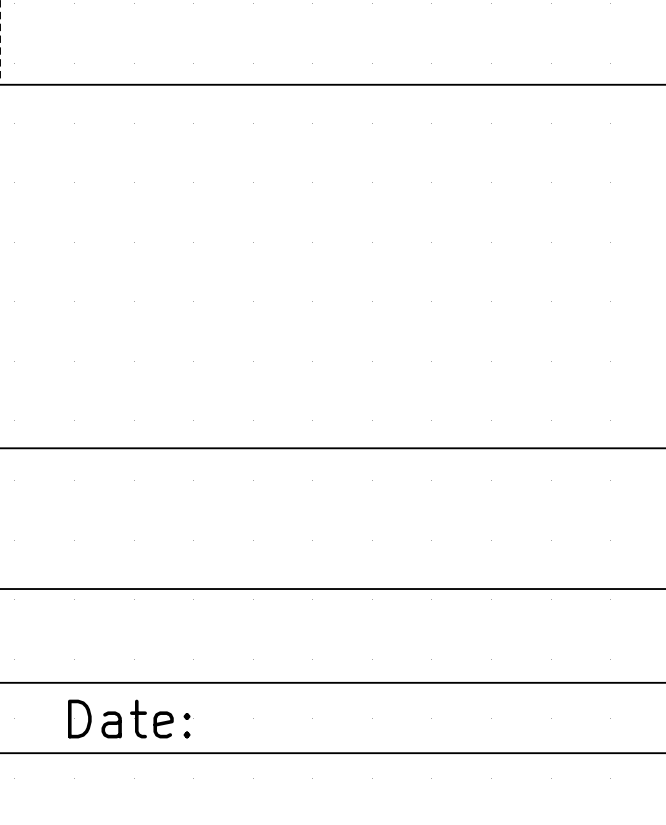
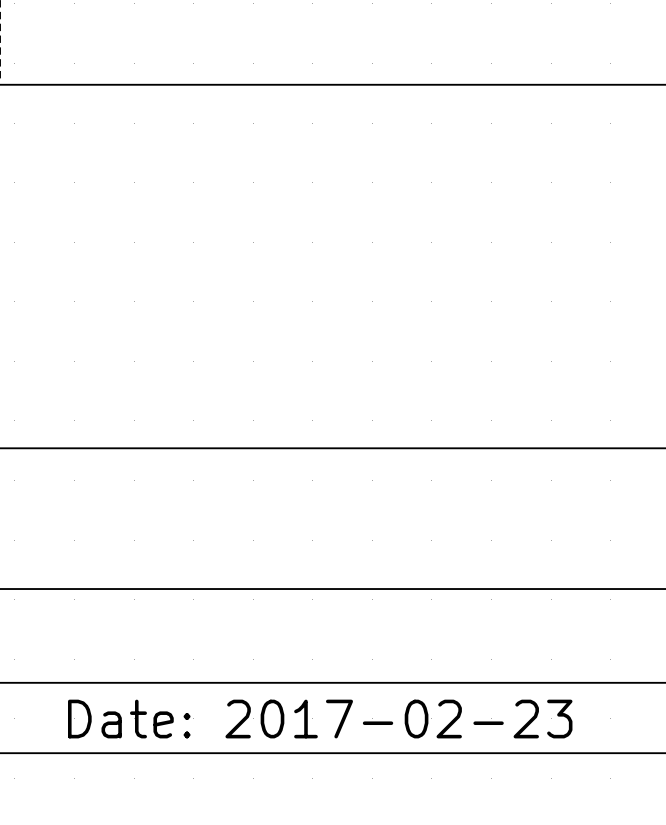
title block: Date: (129, 719) -> Date: 2017-02-23 (320, 719)

